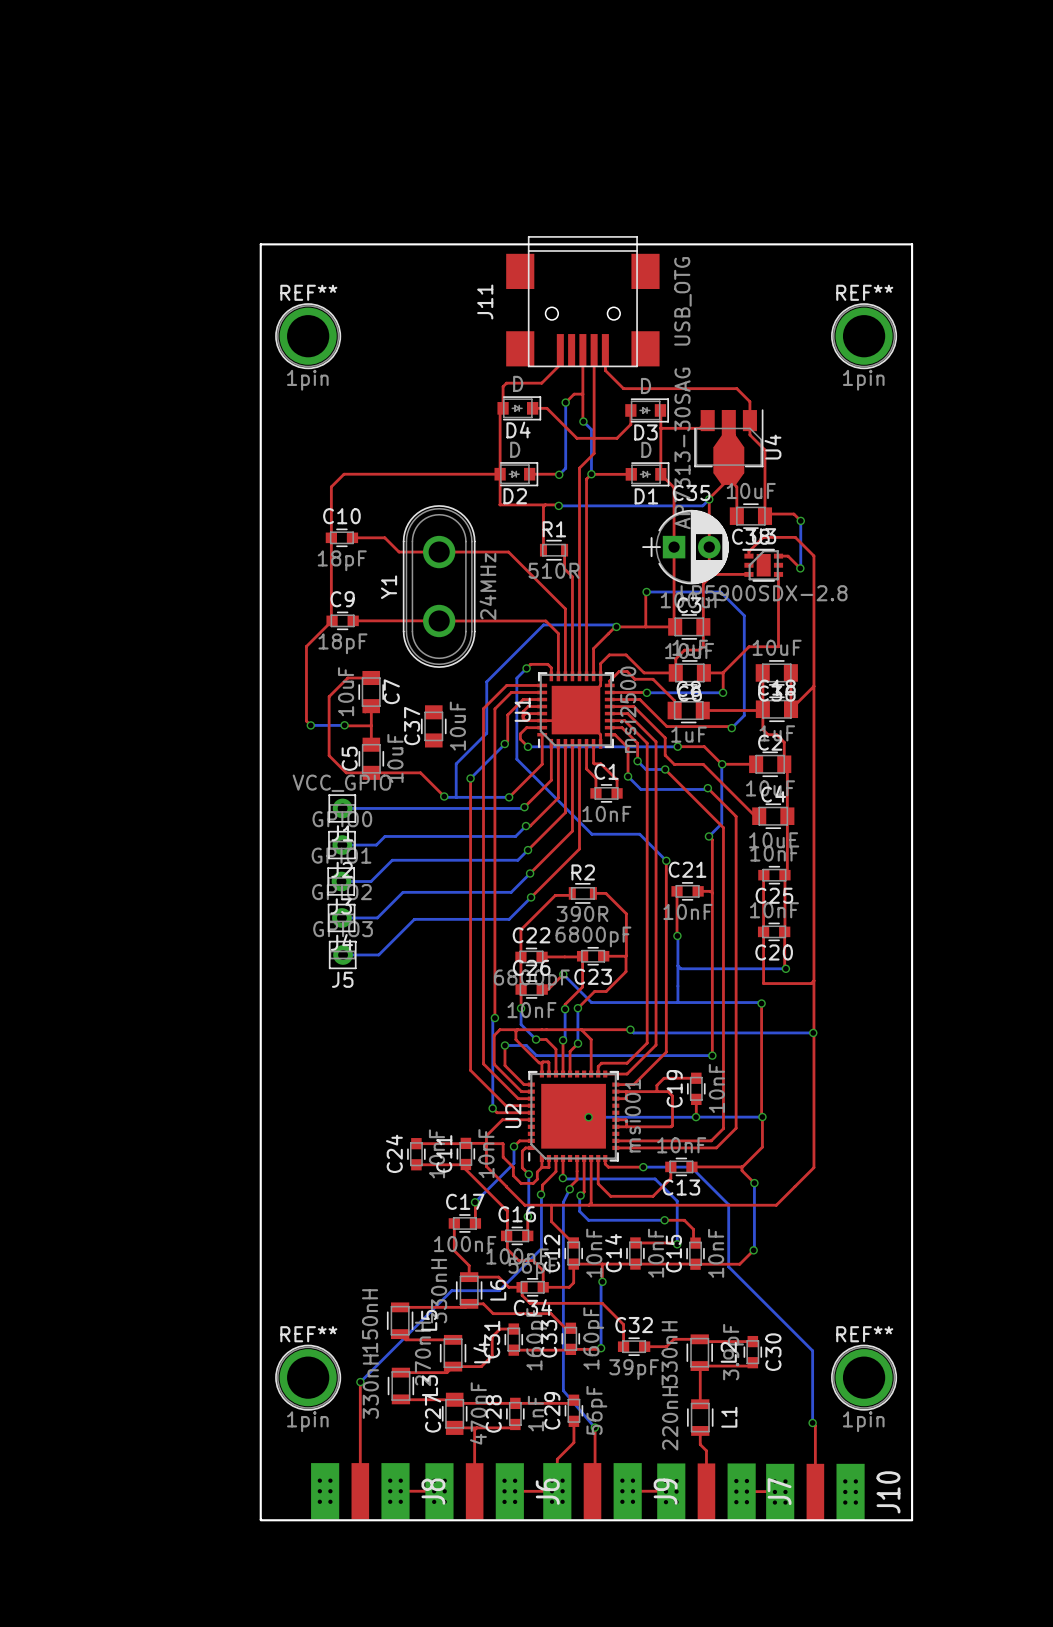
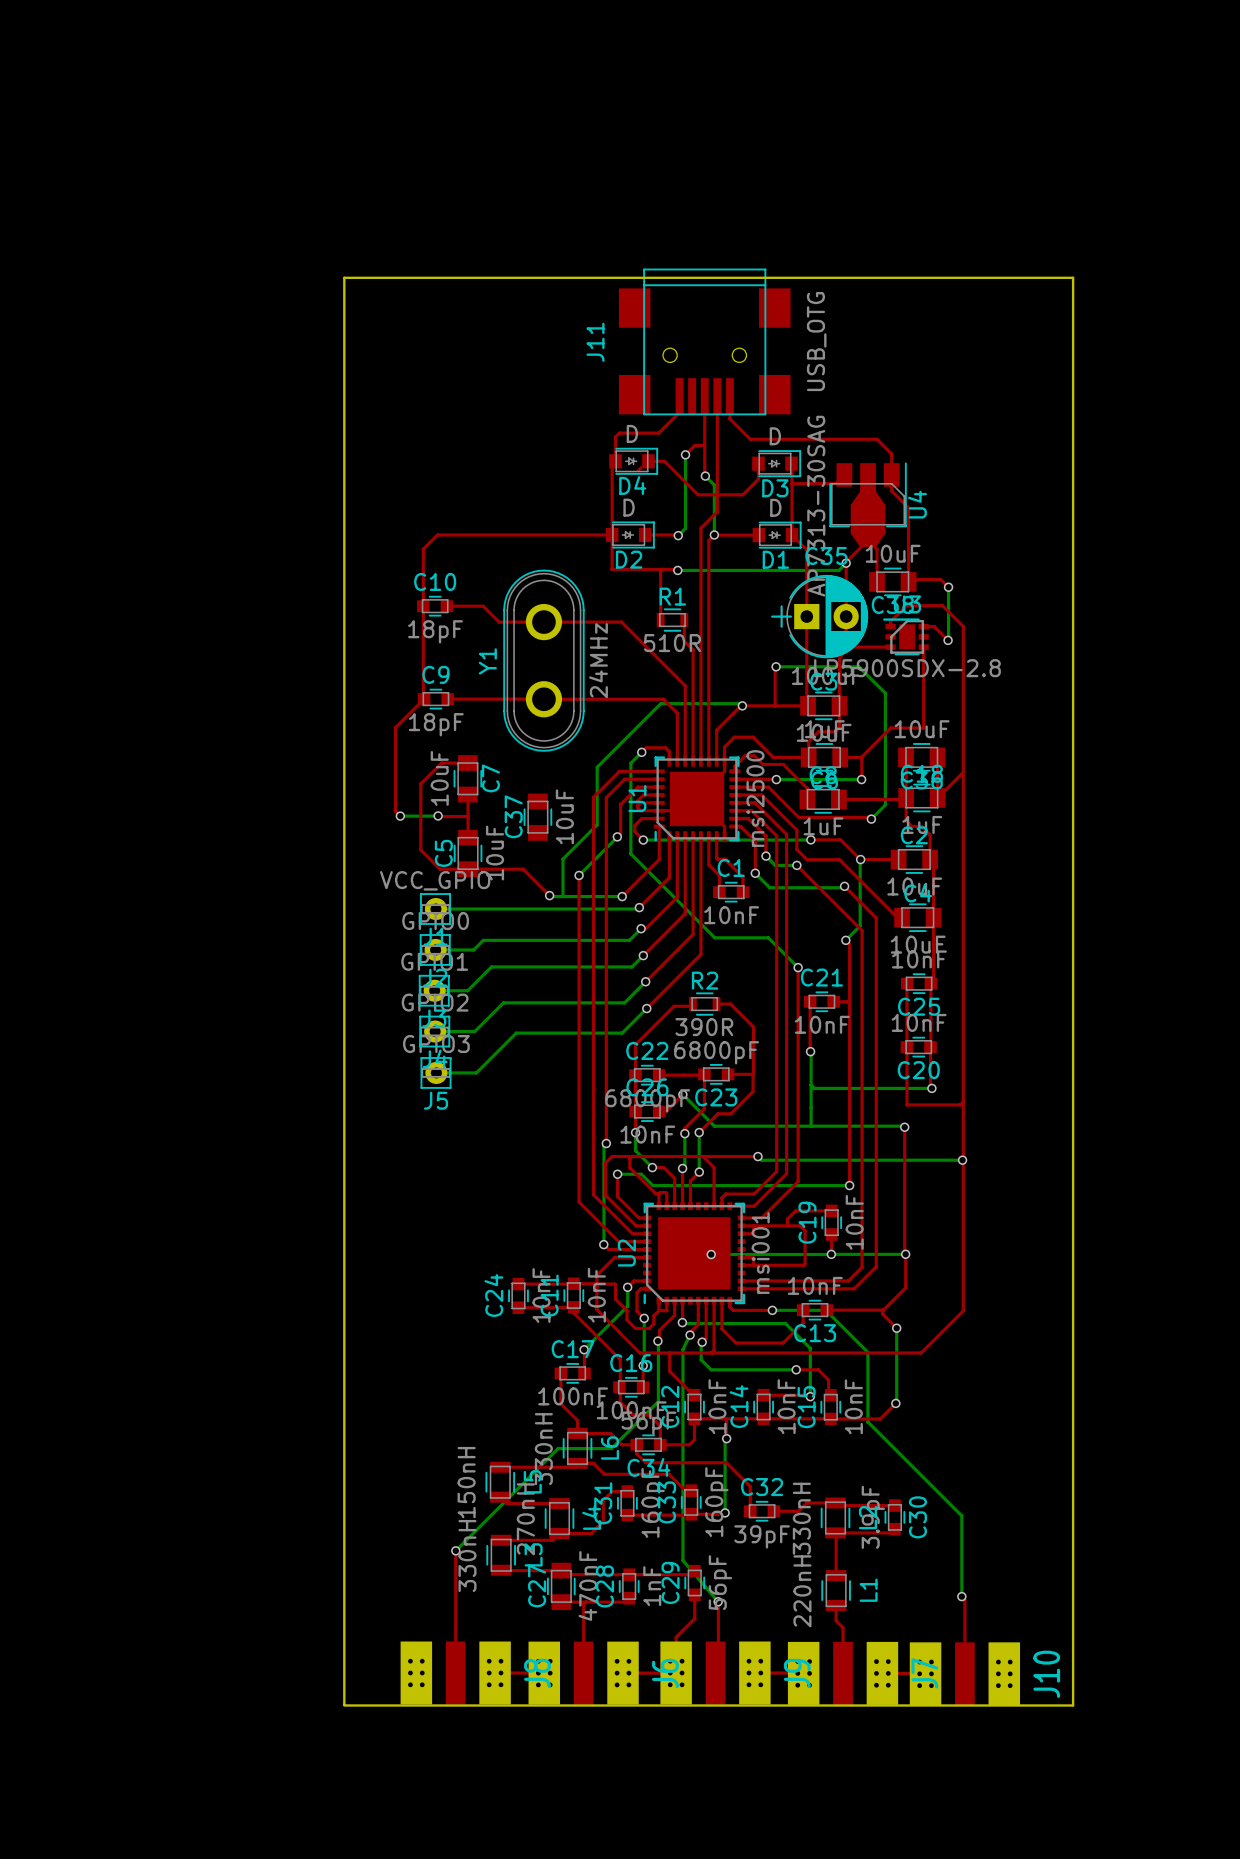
REF**: 1pin (308, 336) -> none
REF**: 1pin (864, 336) -> none
top track: none -> (641, 467) (638, 470)
REF**: 1pin (308, 1377) -> none
REF**: 1pin (864, 1377) -> none

